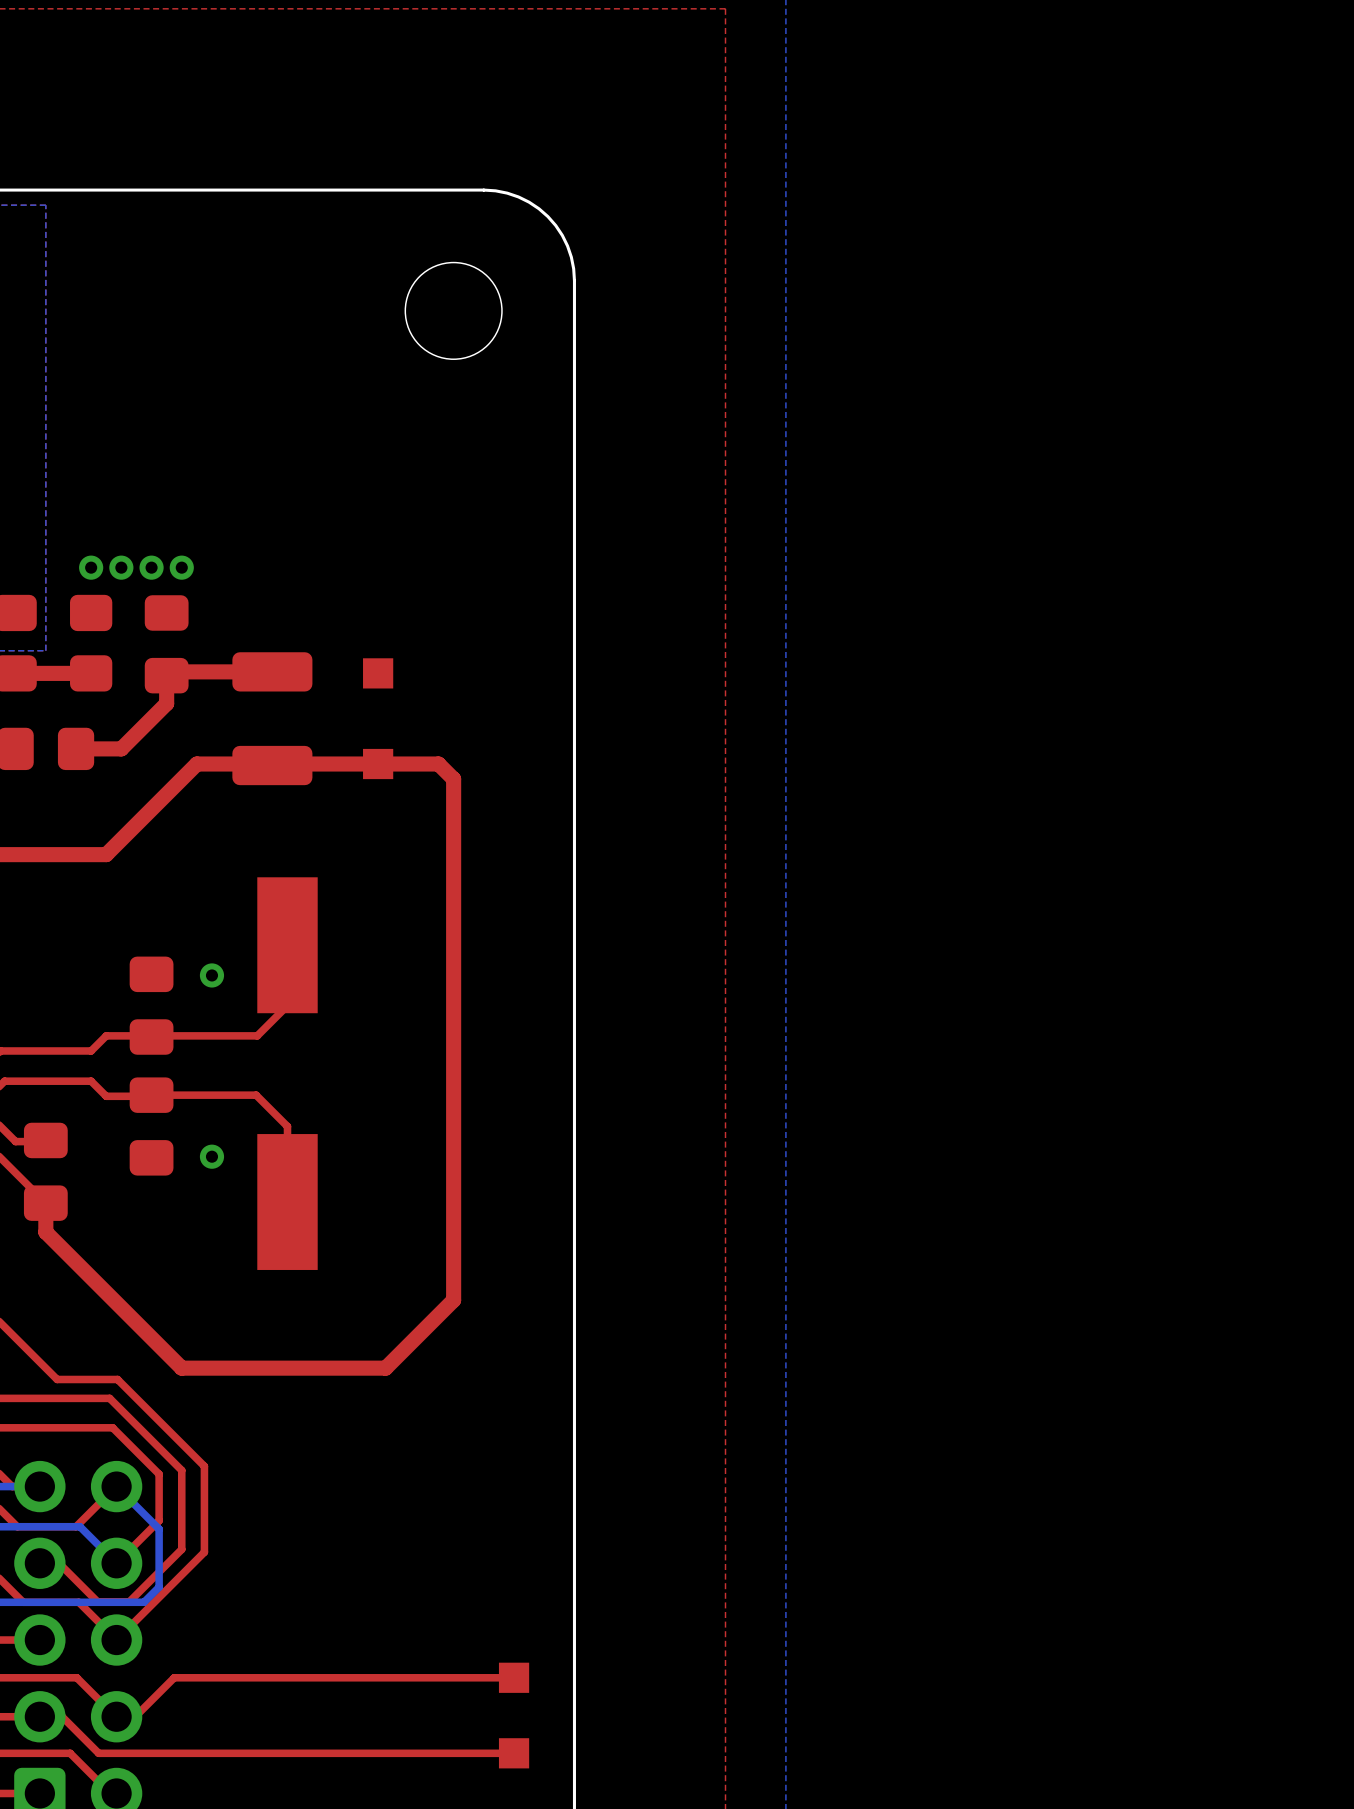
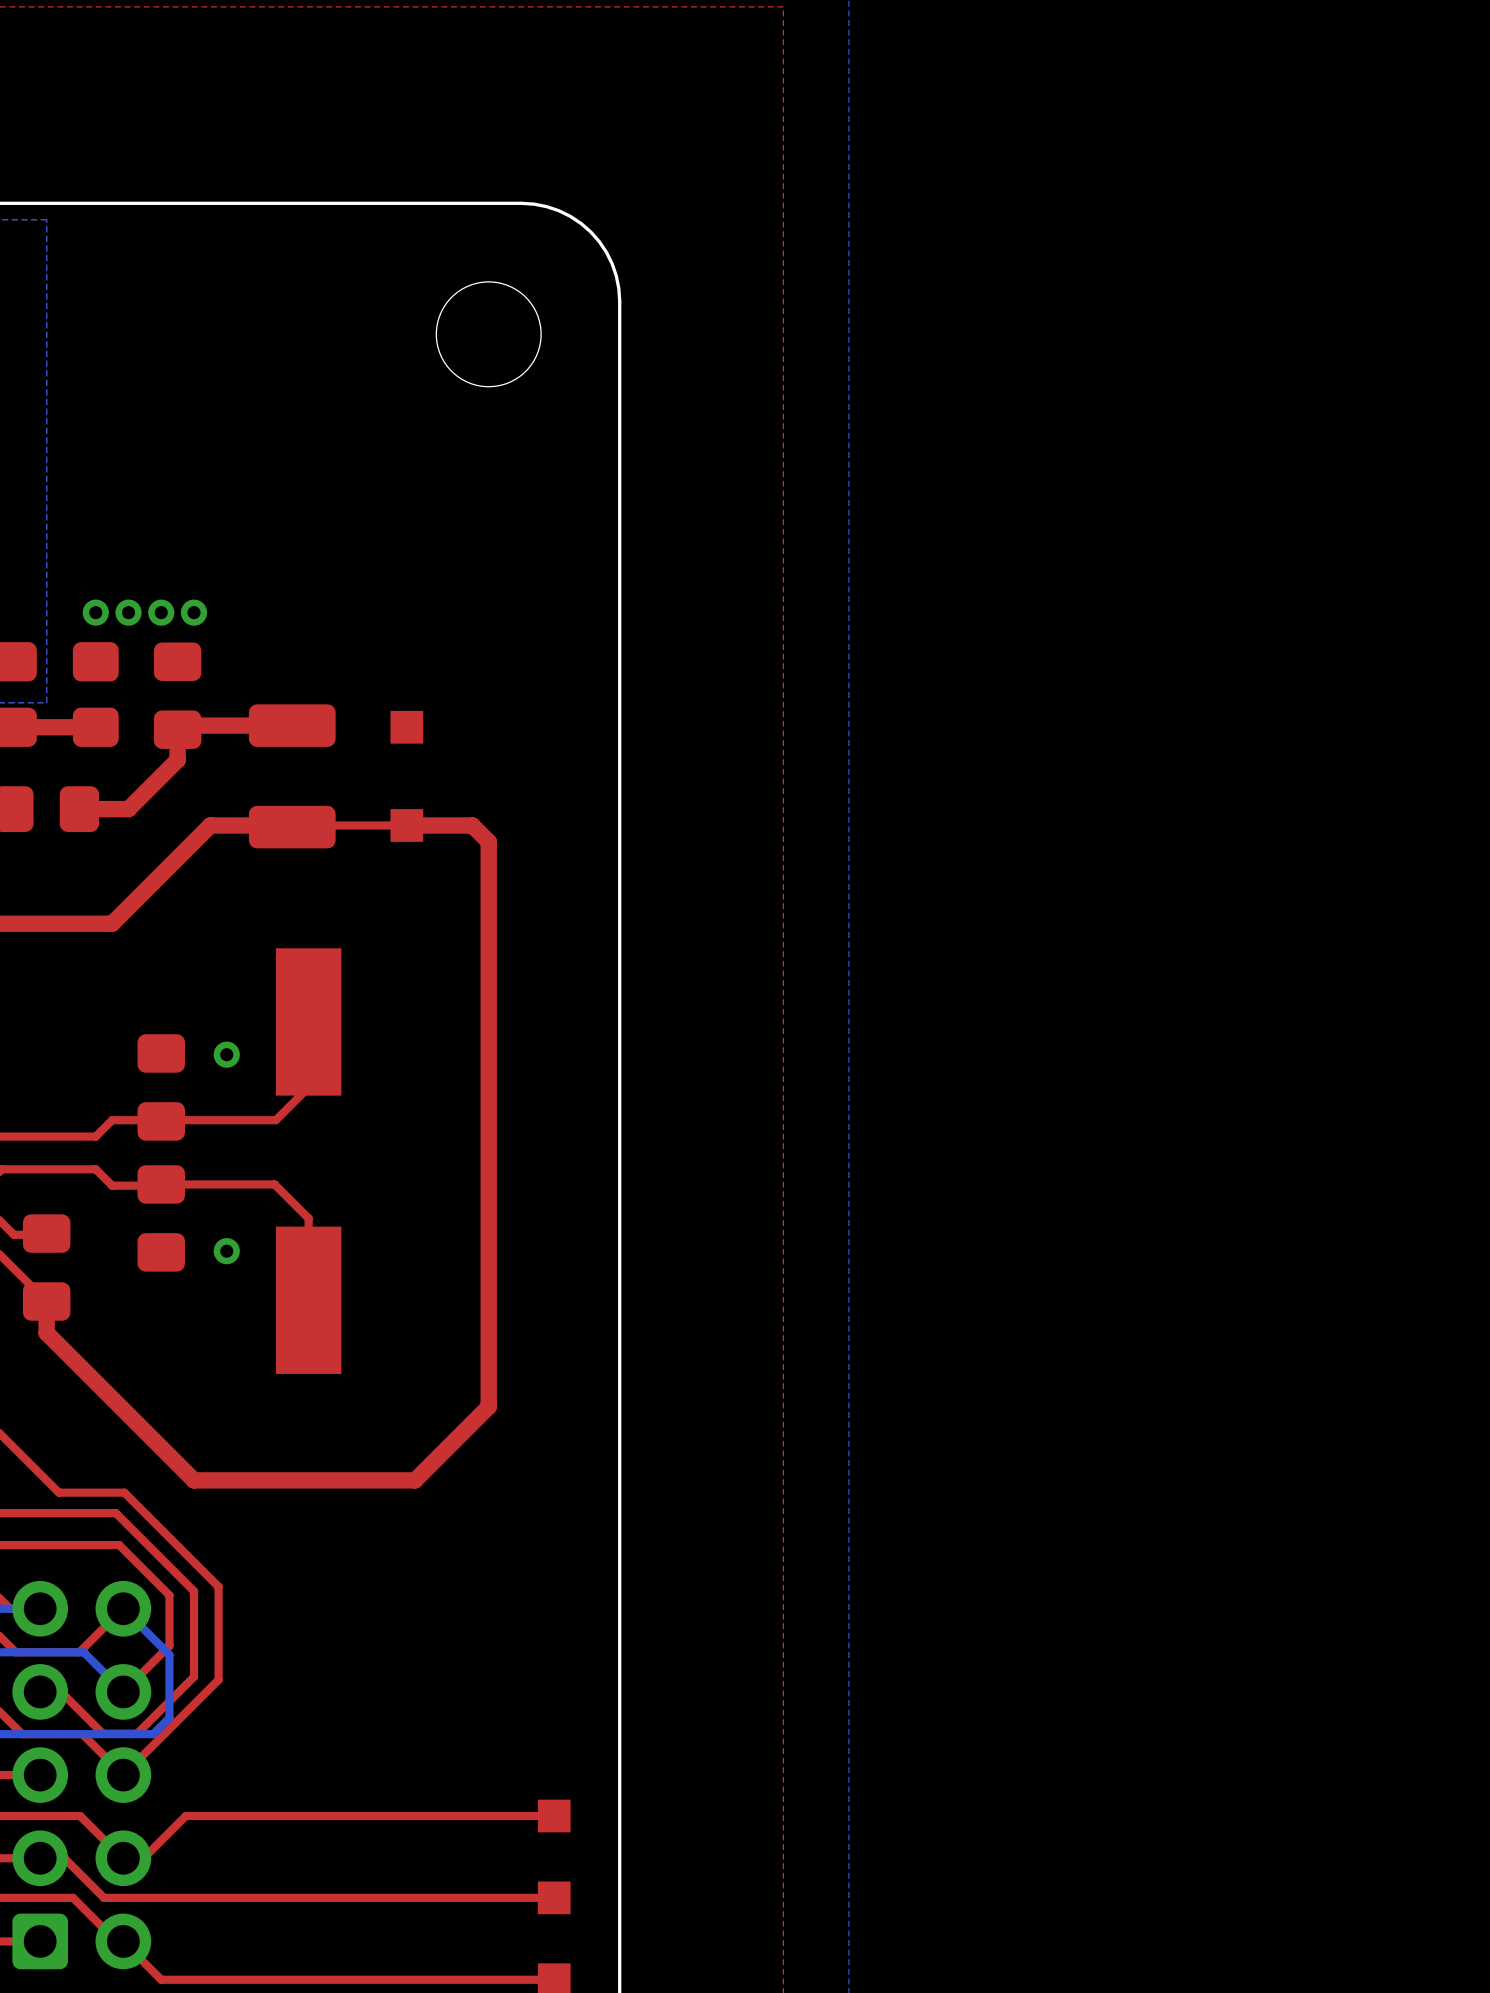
top track width: thick (378, 764) (272, 765) -> thin (406, 825) (293, 825) (292, 827)

